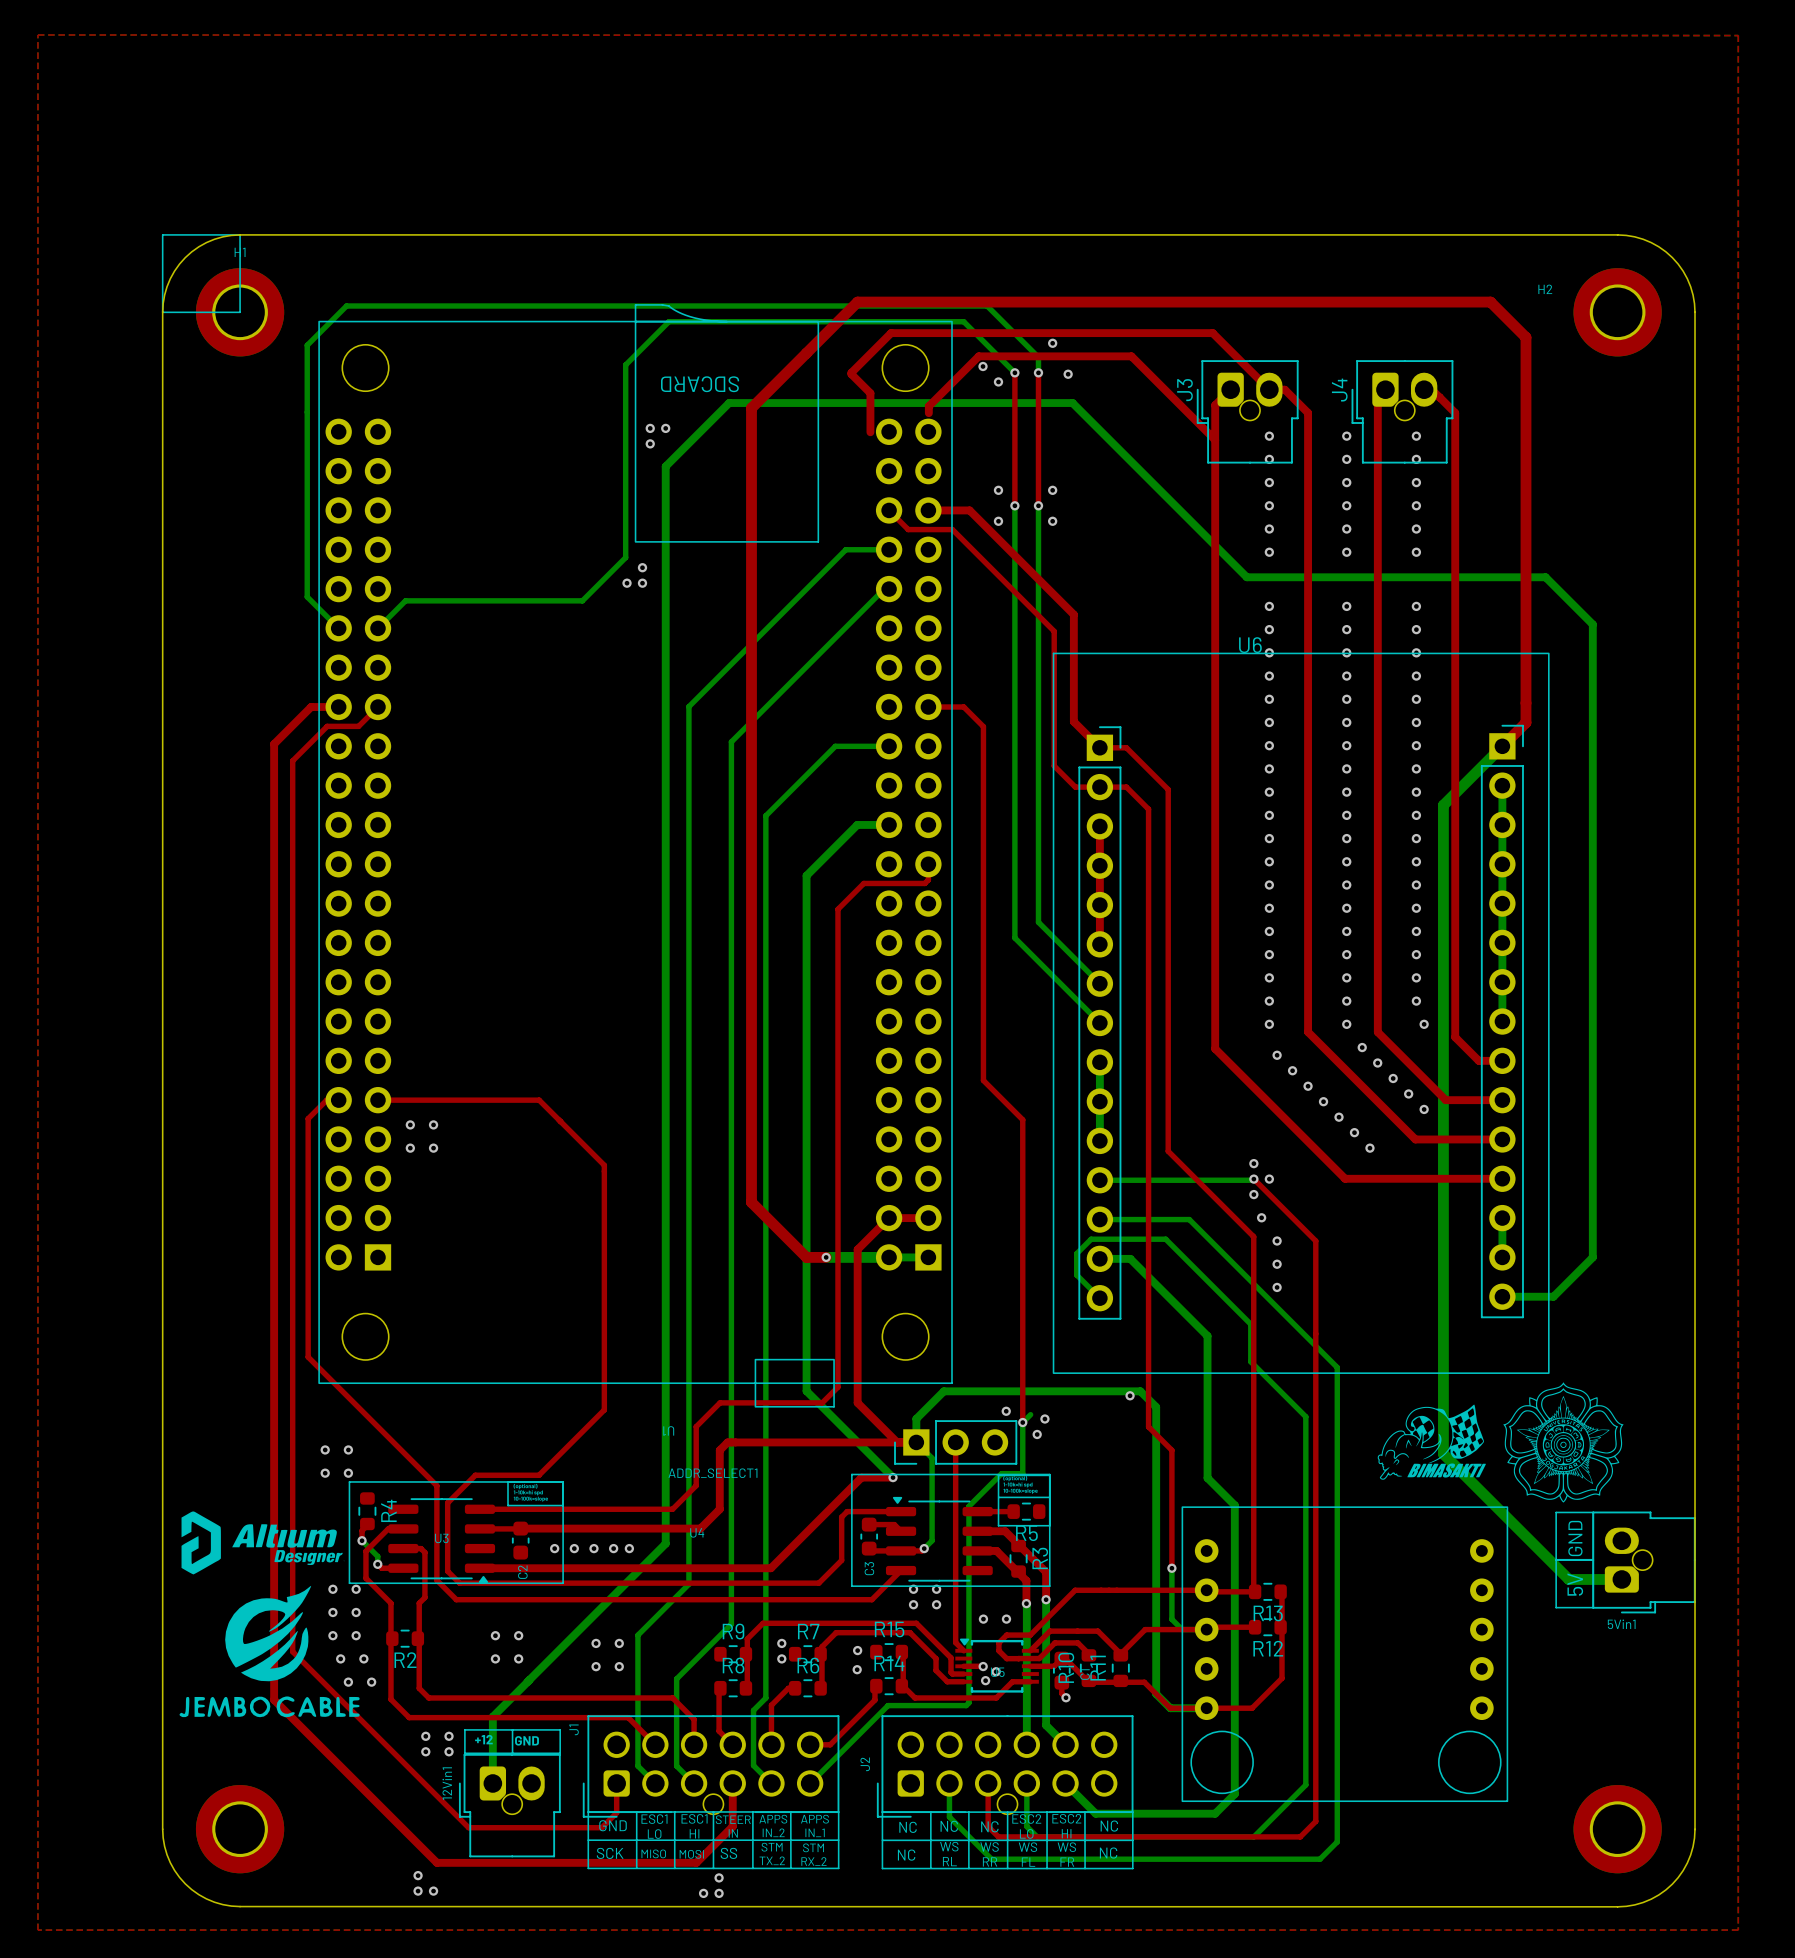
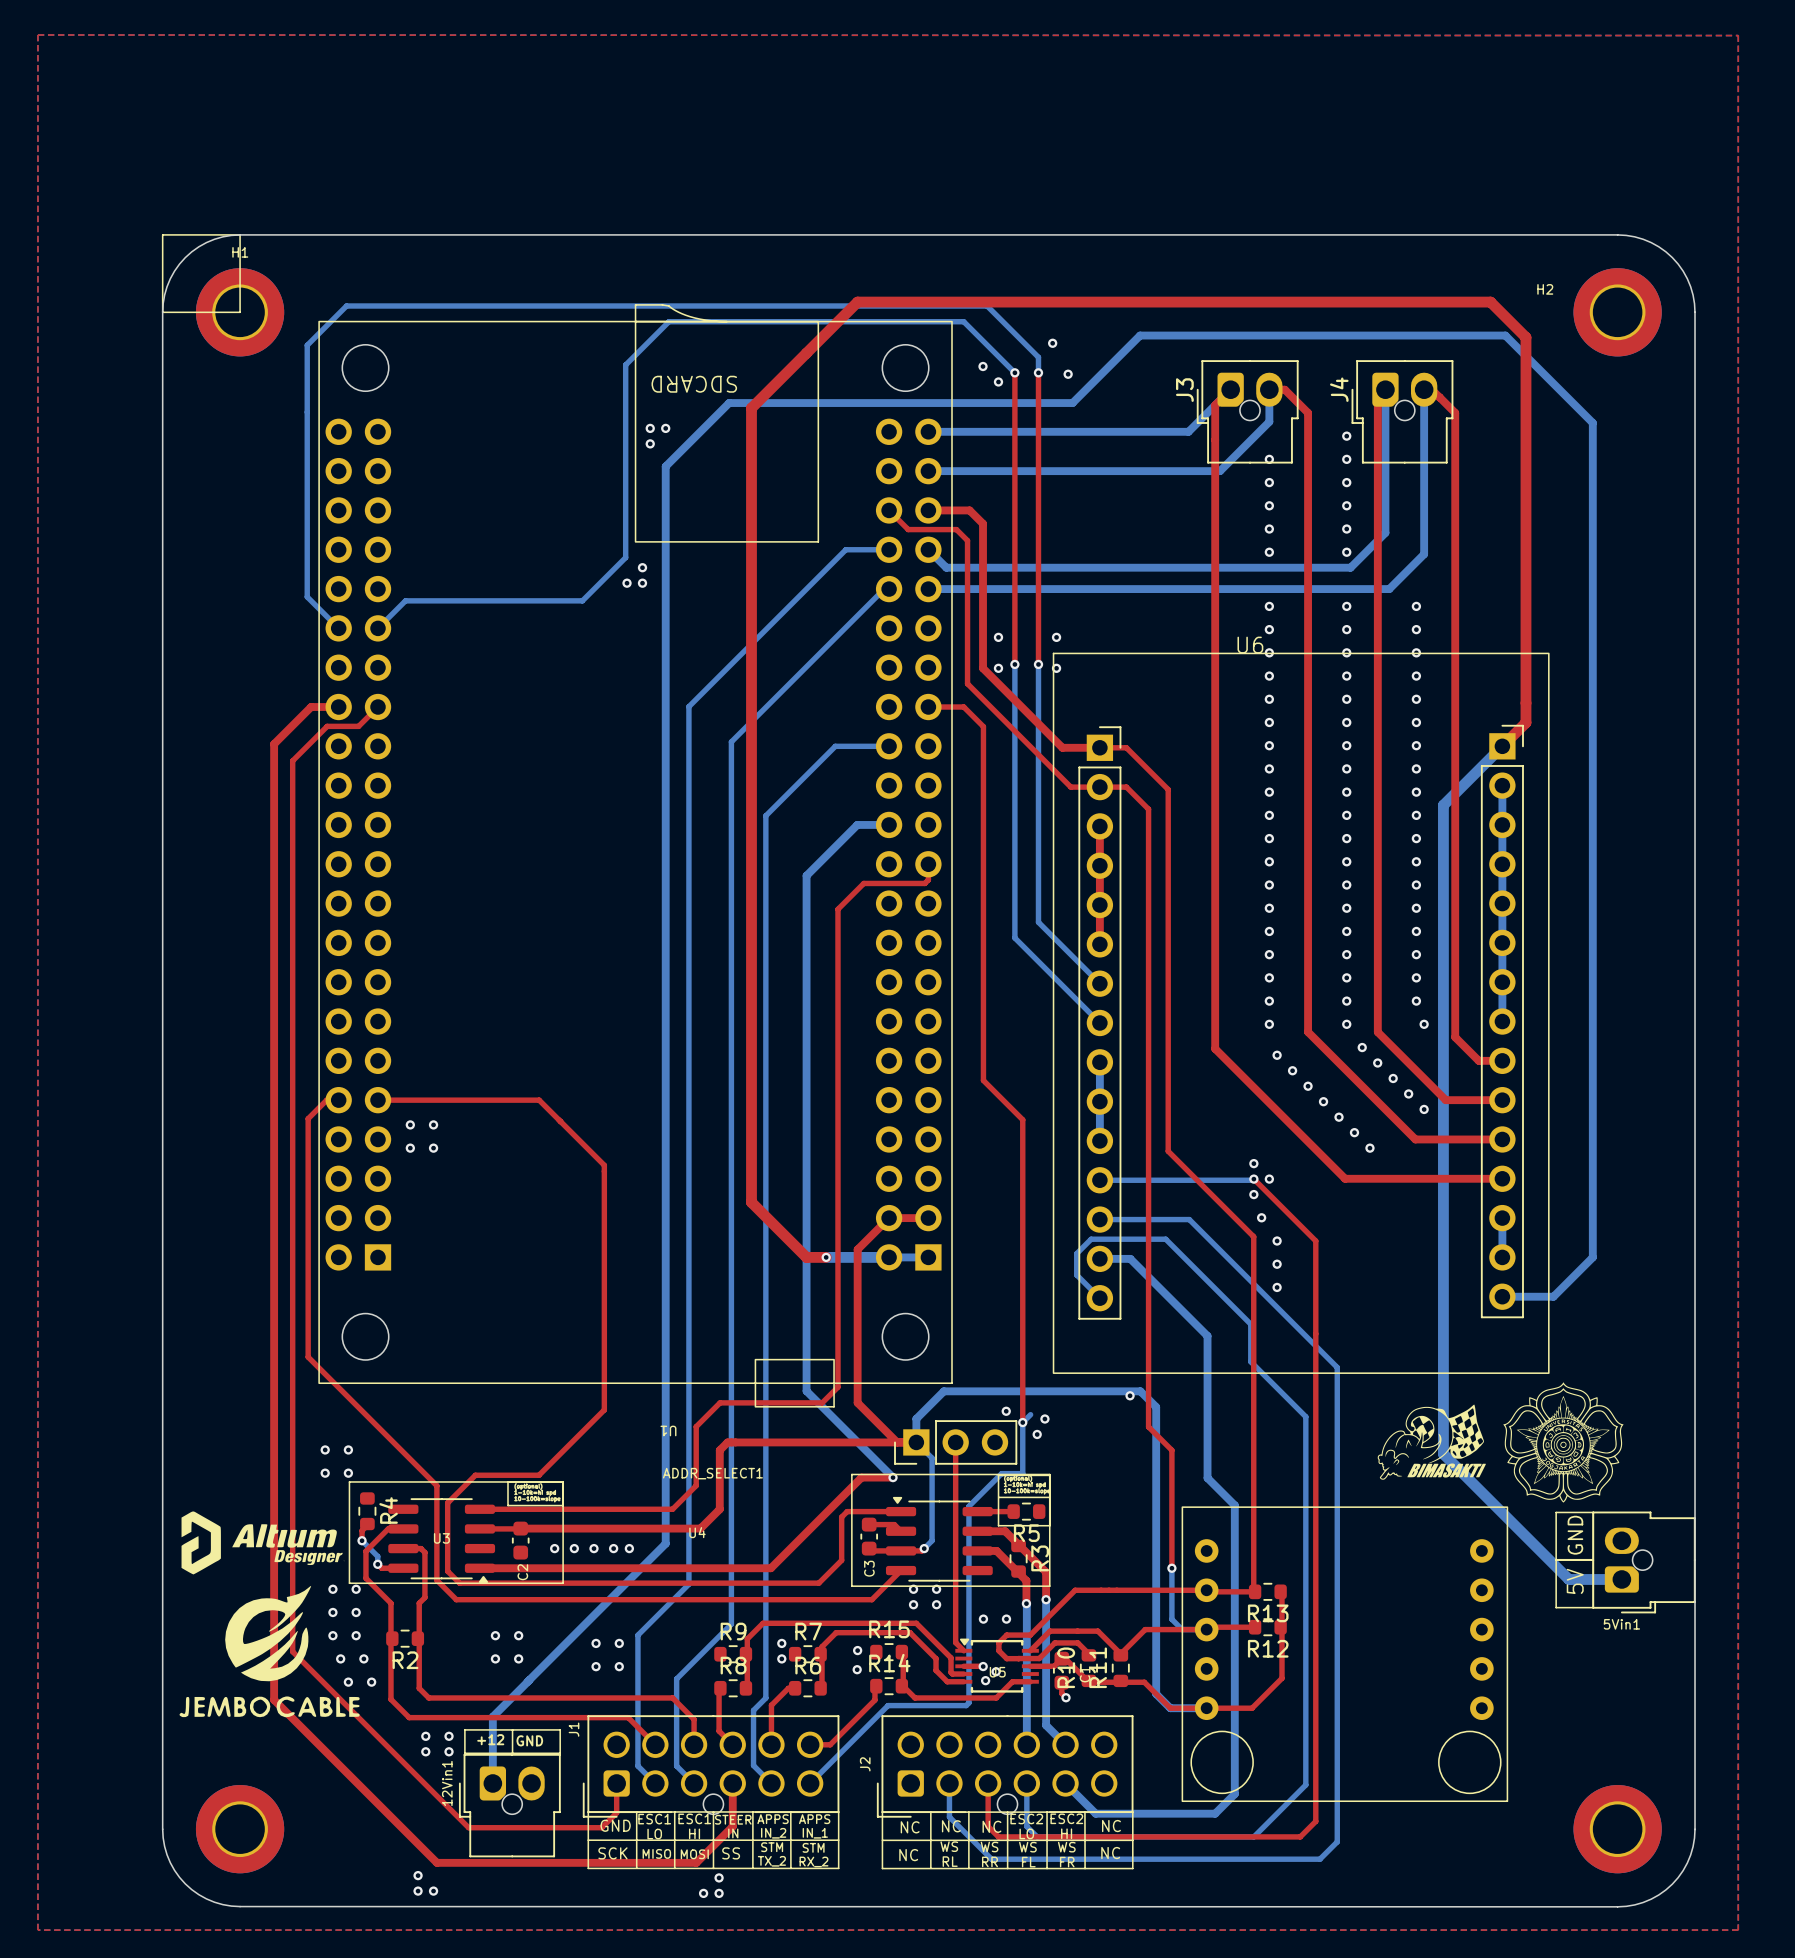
bottom track: none -> (1230, 389) (1188, 431) (928, 431)
top track: (1269, 389) (1212, 333) (891, 333) (851, 372) (870, 393) (870, 432) -> none
bottom track: none -> (1269, 389) (1269, 421) (1220, 471) (928, 471)
bottom track: none -> (1385, 389) (1385, 532) (1350, 567) (946, 567) (928, 549)
bottom track: none -> (1424, 389) (1424, 554) (1389, 589) (928, 589)
bottom track: (1072, 403) (1246, 577) (1545, 577) (1592, 624) -> (1072, 403) (1140, 335) (1505, 335) (1592, 422) (1592, 624)
top track: (928, 413) (928, 406) (978, 356) (1131, 356) (1215, 440) -> none
via: (1269, 436) -> none
via: (1416, 436) -> none
via: (1416, 459) -> none
via: (1416, 482) -> none
via: (998, 490) -> none
via: (1052, 490) -> none
top track: none -> (1014, 505) (1014, 664)
bottom track: (1014, 505) (1014, 664) -> none
via: (1014, 505) -> none
top track: none -> (1038, 505) (1038, 664)
bottom track: (1038, 505) (1038, 664) -> none
via: (1038, 505) -> none
via: (1416, 505) -> none
via: (998, 521) -> none
via: (1052, 521) -> none
top track: (983, 523) (1073, 614) (1073, 721) (1099, 747) -> (983, 523) (983, 668) (1062, 747) (1099, 747)
top track: (952, 529) (1054, 631) (1054, 765) (1075, 787) -> (952, 529) (956, 529) (967, 540) (967, 683) (1070, 787) (1075, 787)
via: (1416, 529) -> none
via: (1416, 552) -> none
via: none -> (998, 637)
via: none -> (1056, 637)
via: none -> (1014, 664)
via: none -> (1038, 664)
via: none -> (998, 668)
via: none -> (1056, 668)

